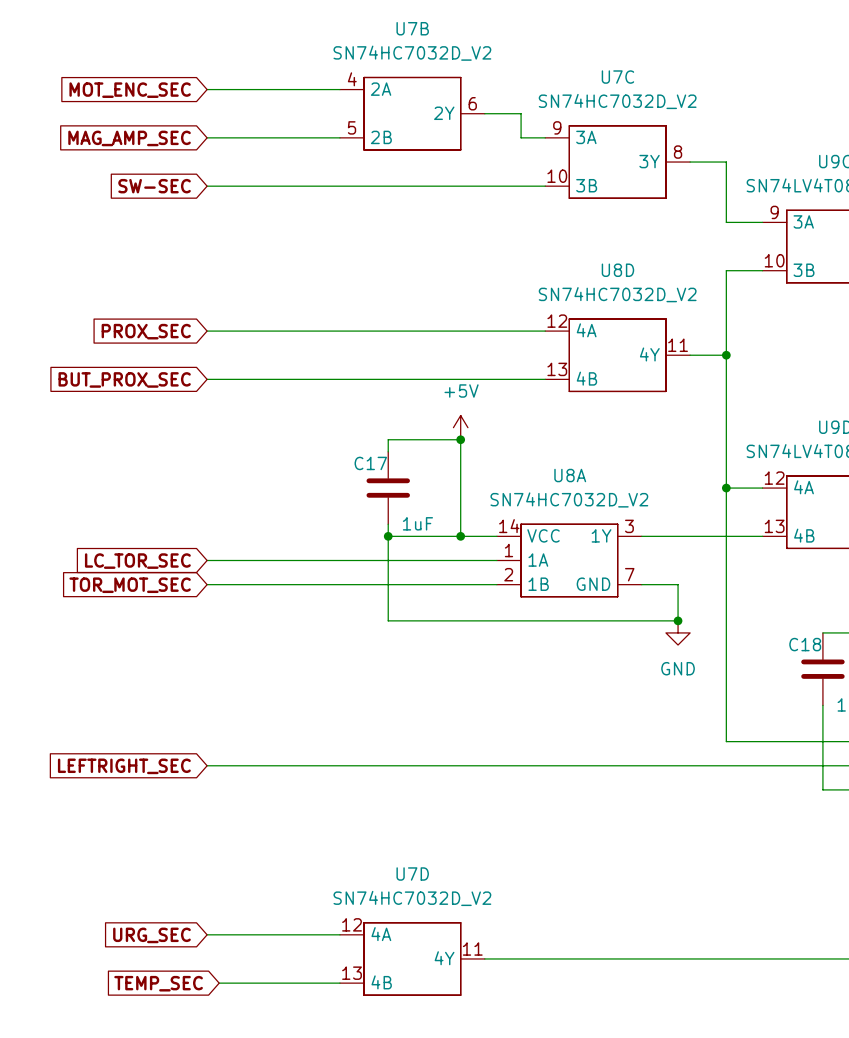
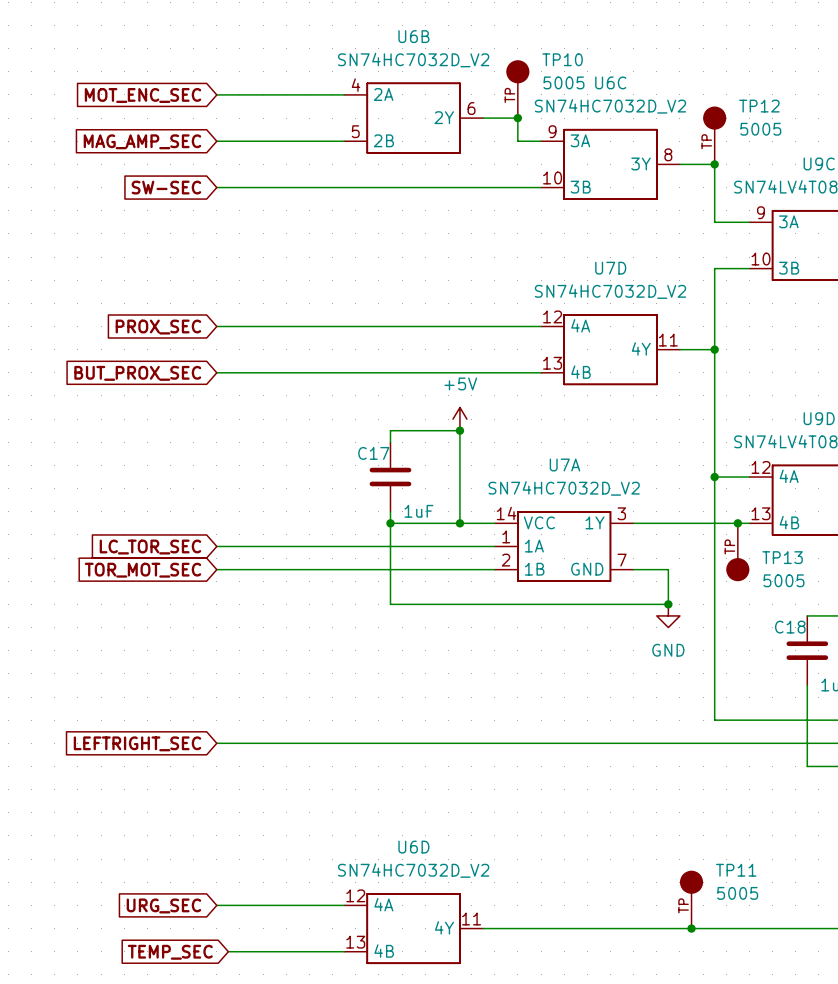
U7B name: U7B (412, 28) -> U6B (413, 36)
U7C name: U7C (617, 77) -> U6C (610, 82)
TP10: none -> 5005 (517, 89)
junction: none -> (517, 118)
TP12: none -> 5005 (714, 135)
junction: none -> (714, 164)
U8D name: U8D (617, 270) -> U7D (610, 268)
U8A name: U8A (570, 475) -> U7A (564, 465)
junction: none -> (737, 523)
TP13: none -> 5005 (737, 552)
U7D name: U7D (412, 874) -> U6D (413, 847)
TP11: none -> 5005 (691, 899)
junction: none -> (691, 928)

